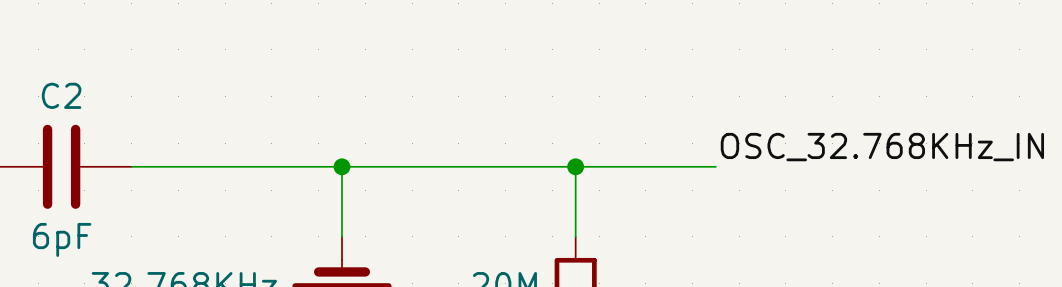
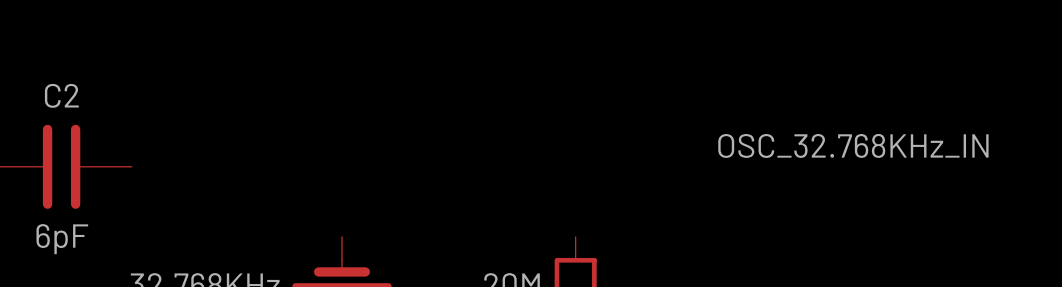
wire: (131, 166) (715, 166) -> none
wire: (341, 166) (341, 236) -> none
junction: (341, 166) -> none
wire: (575, 166) (575, 236) -> none
junction: (575, 166) -> none

